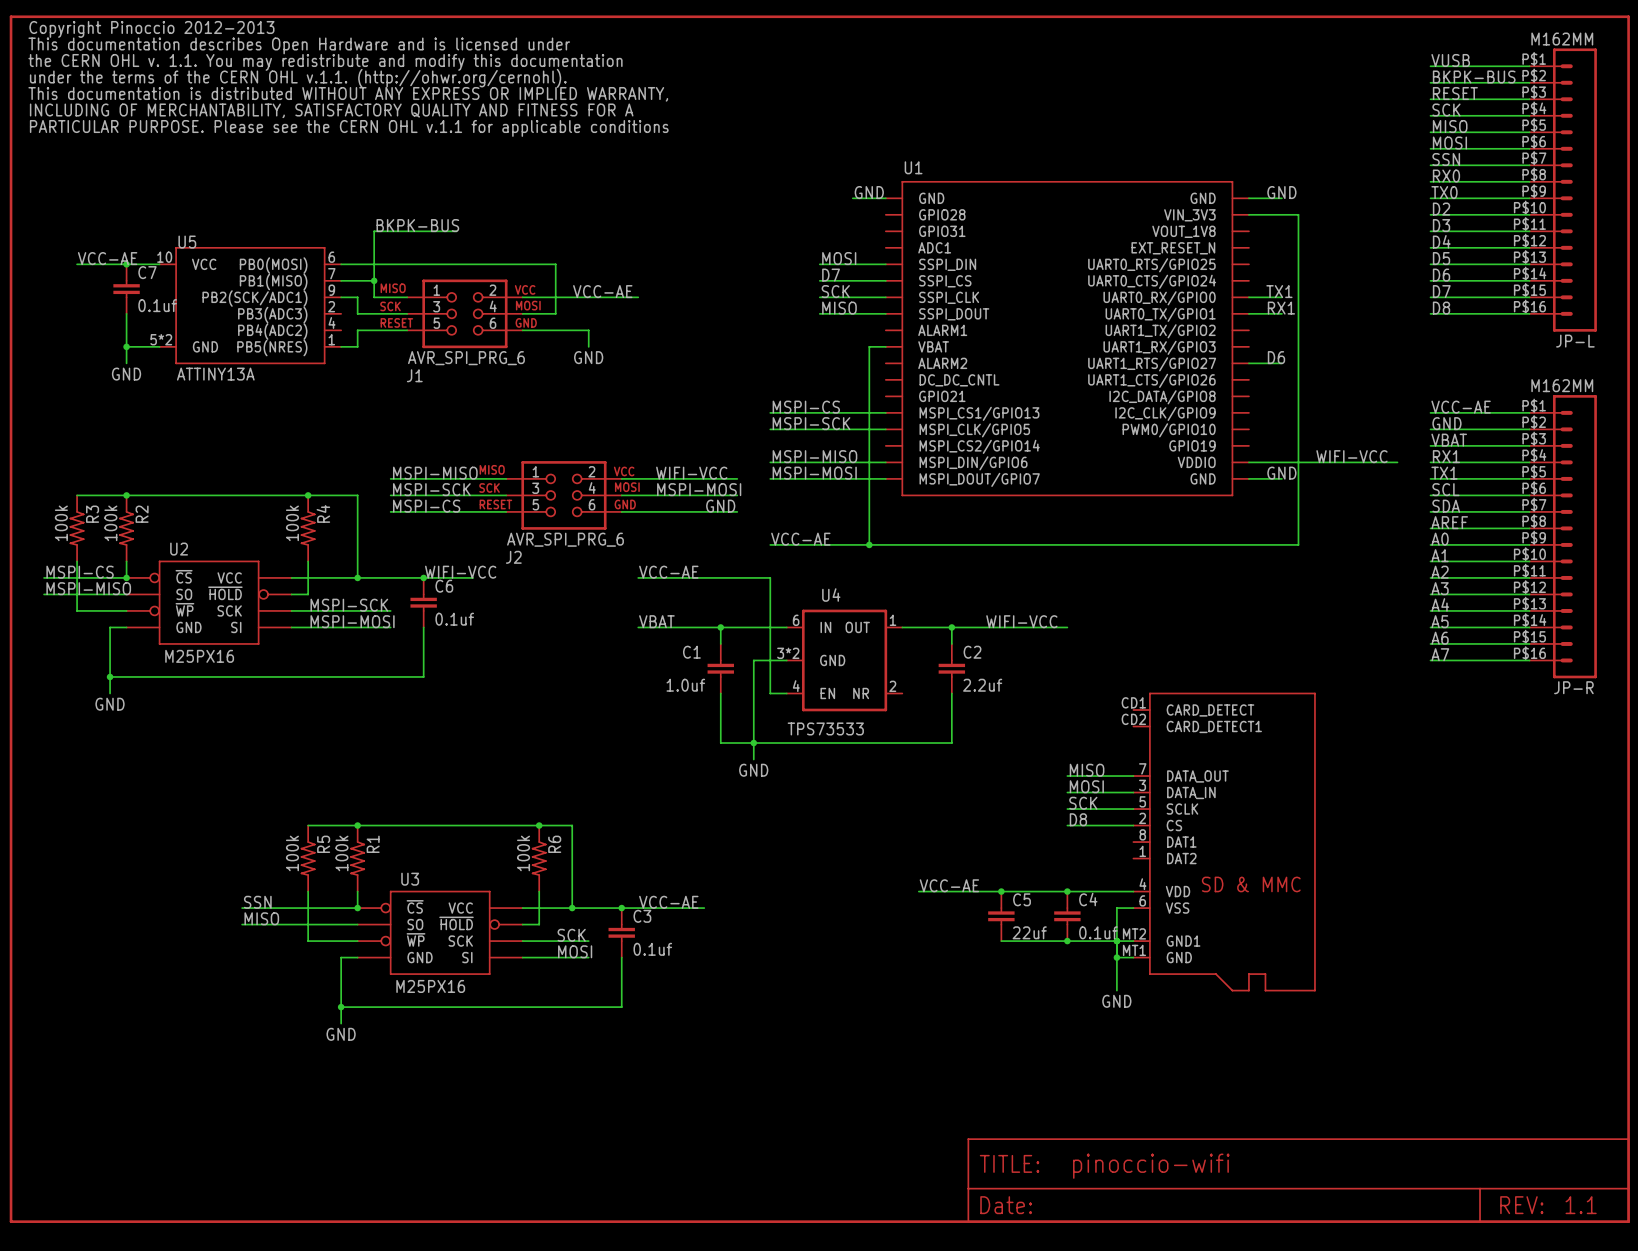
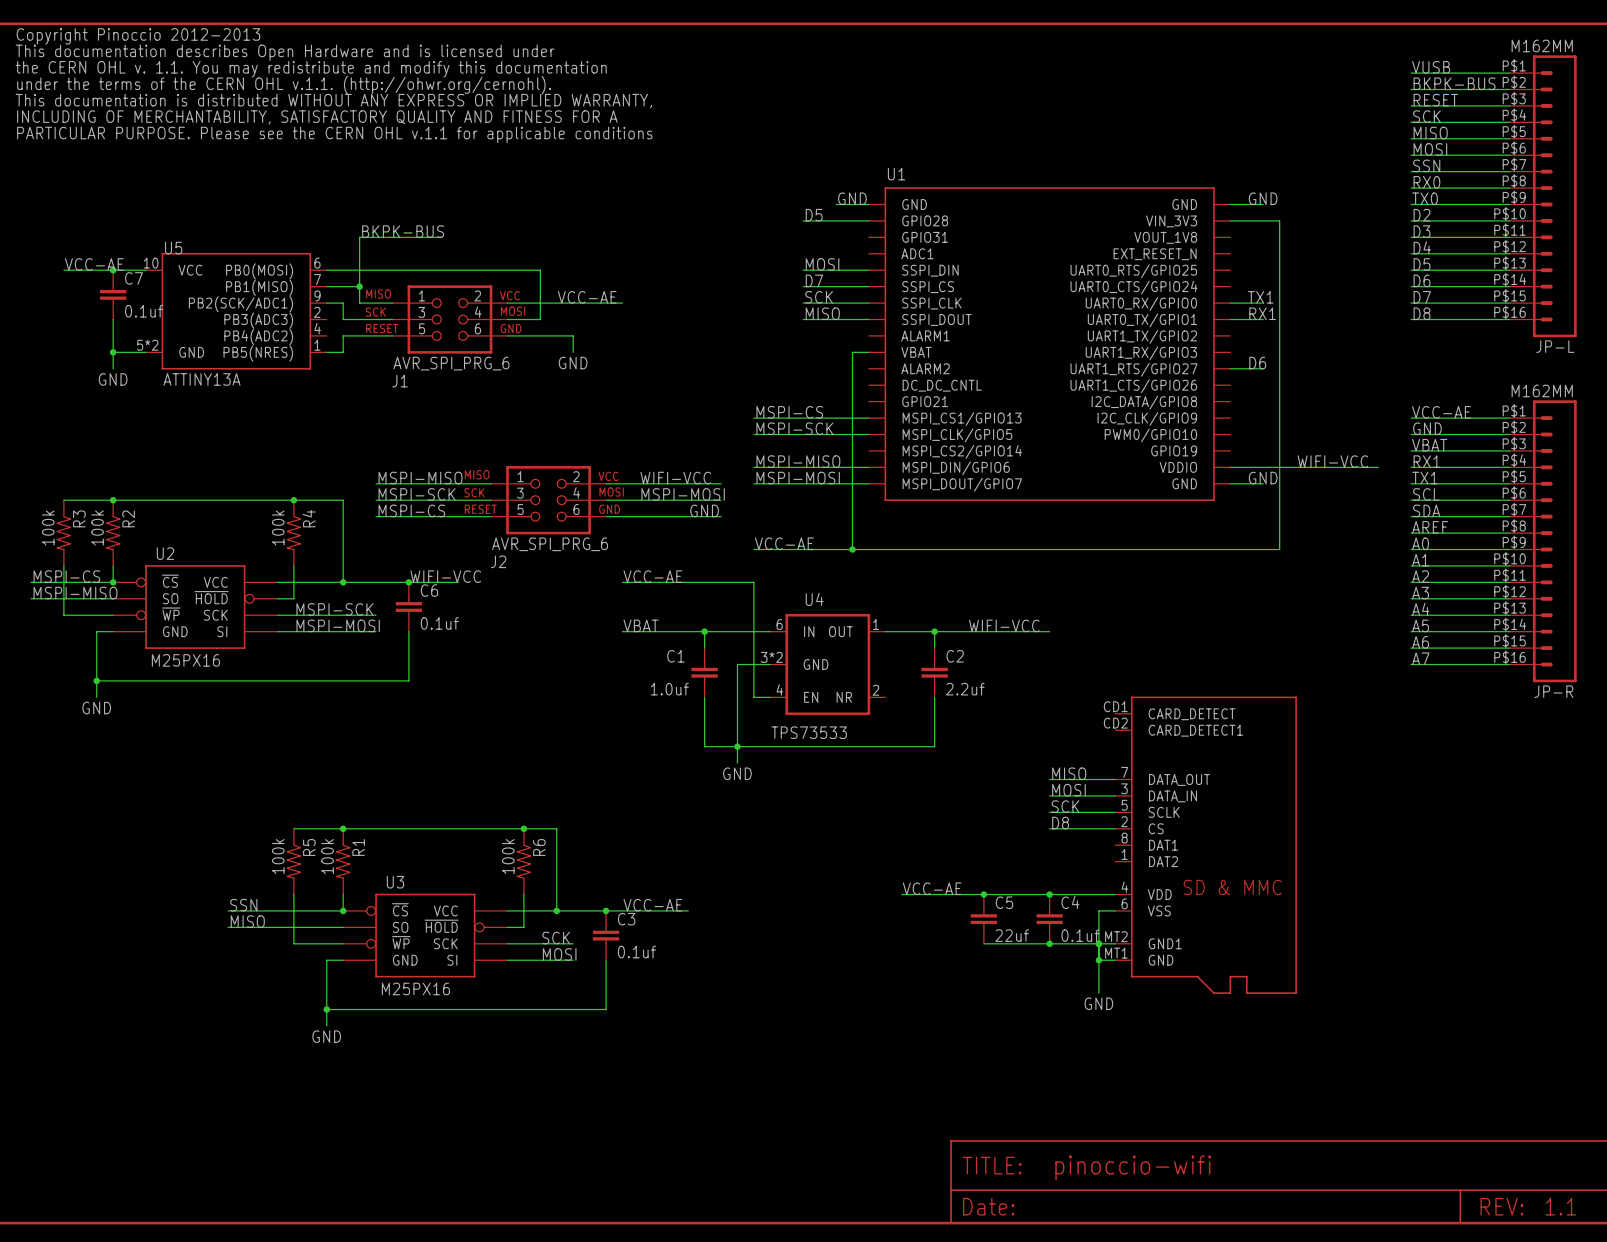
label: none -> D5 (814, 215)
wire: none -> (803, 220) (868, 220)

